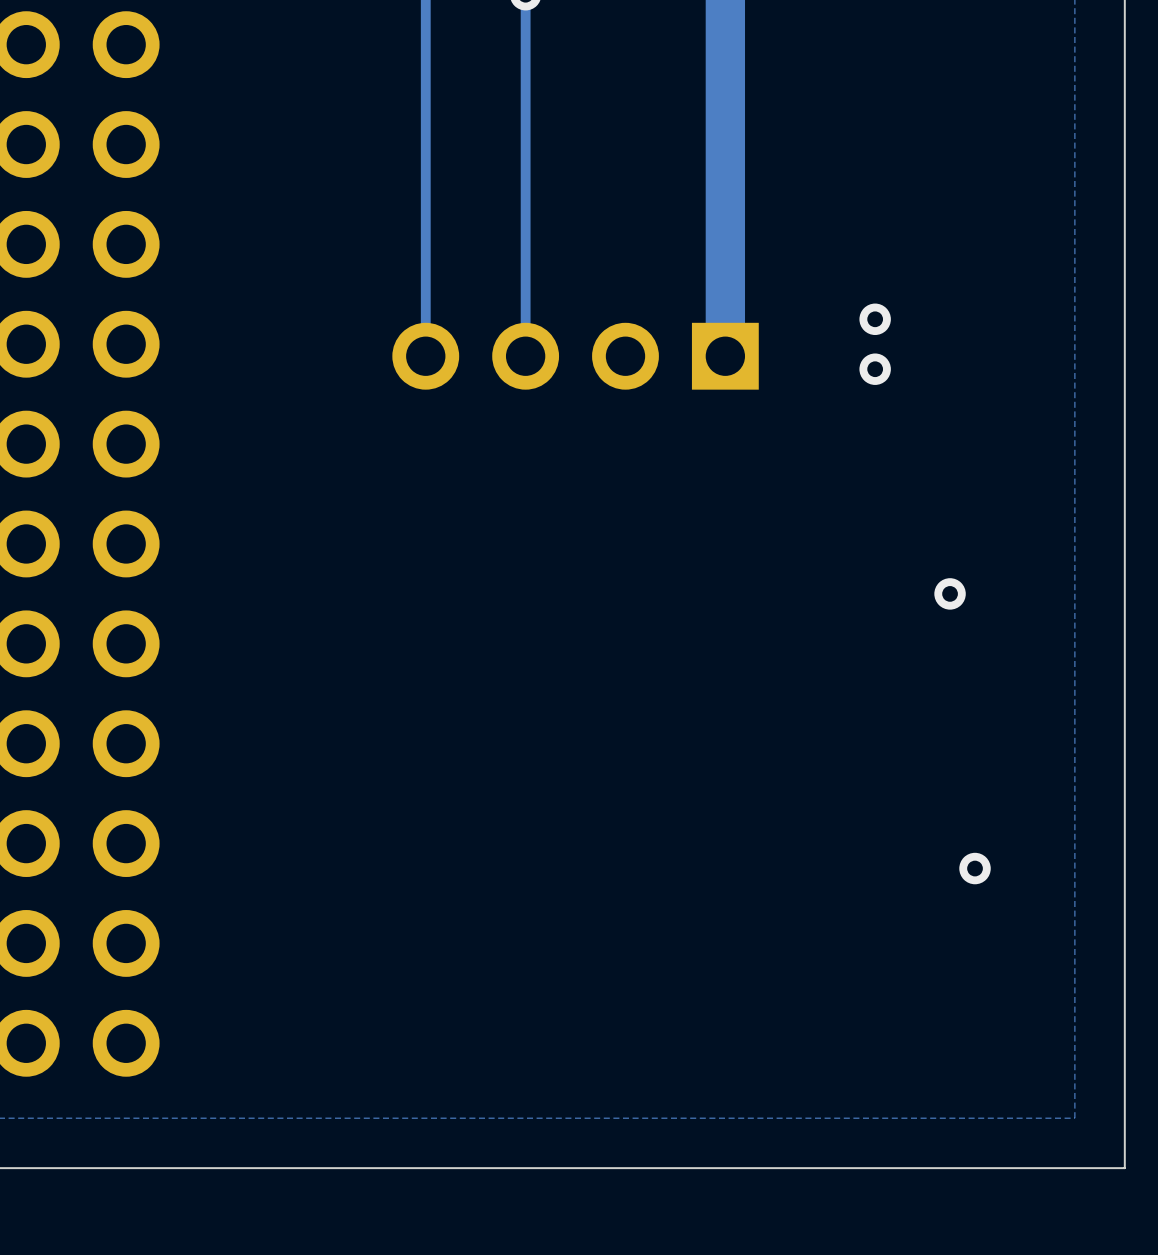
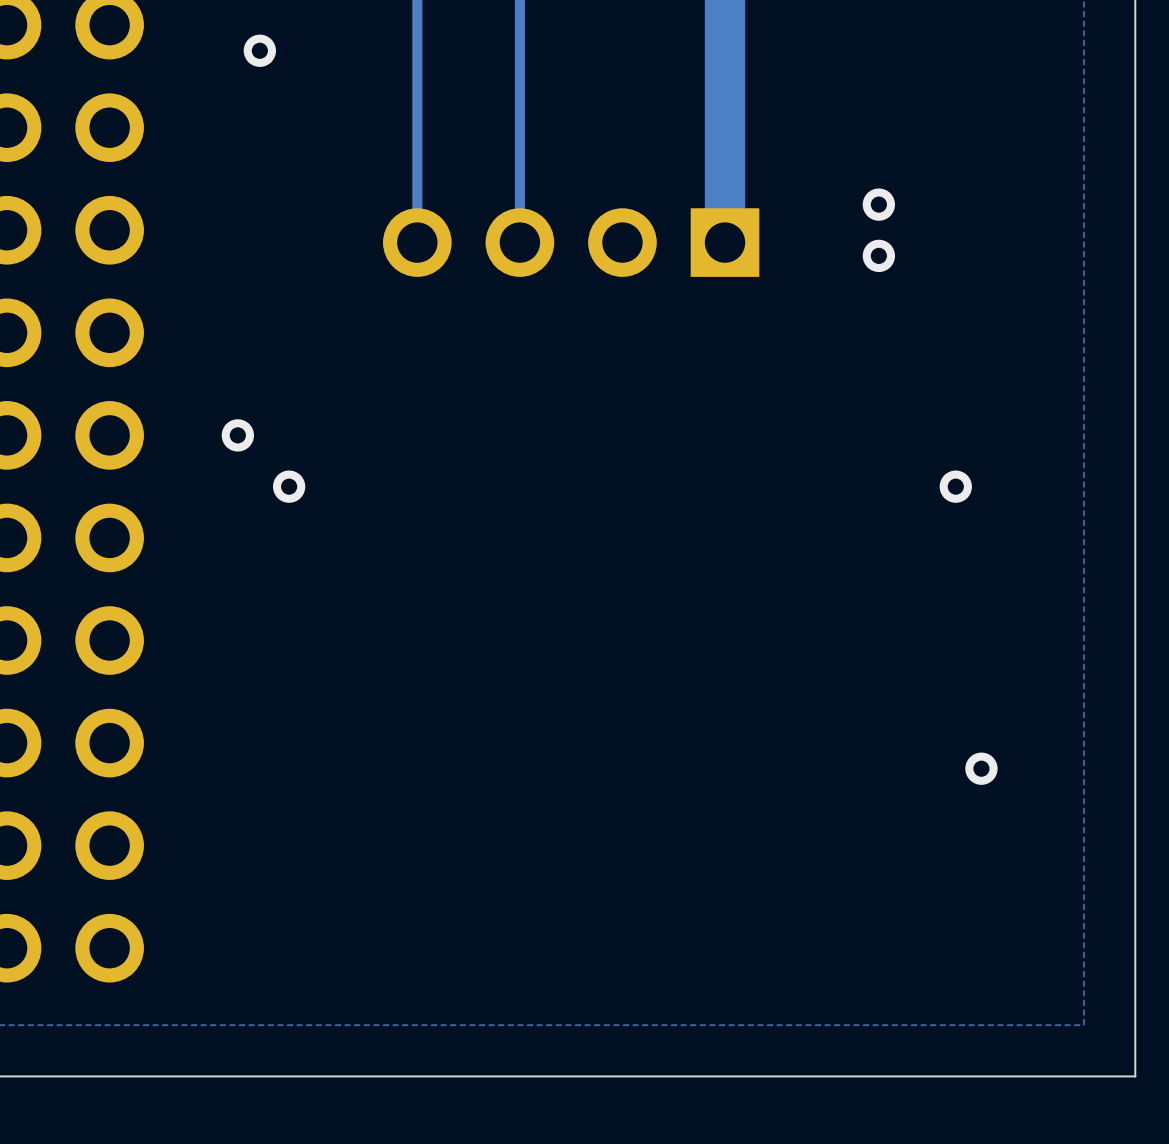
via: none -> (259, 50)
via: none -> (237, 435)
via: none -> (289, 486)

